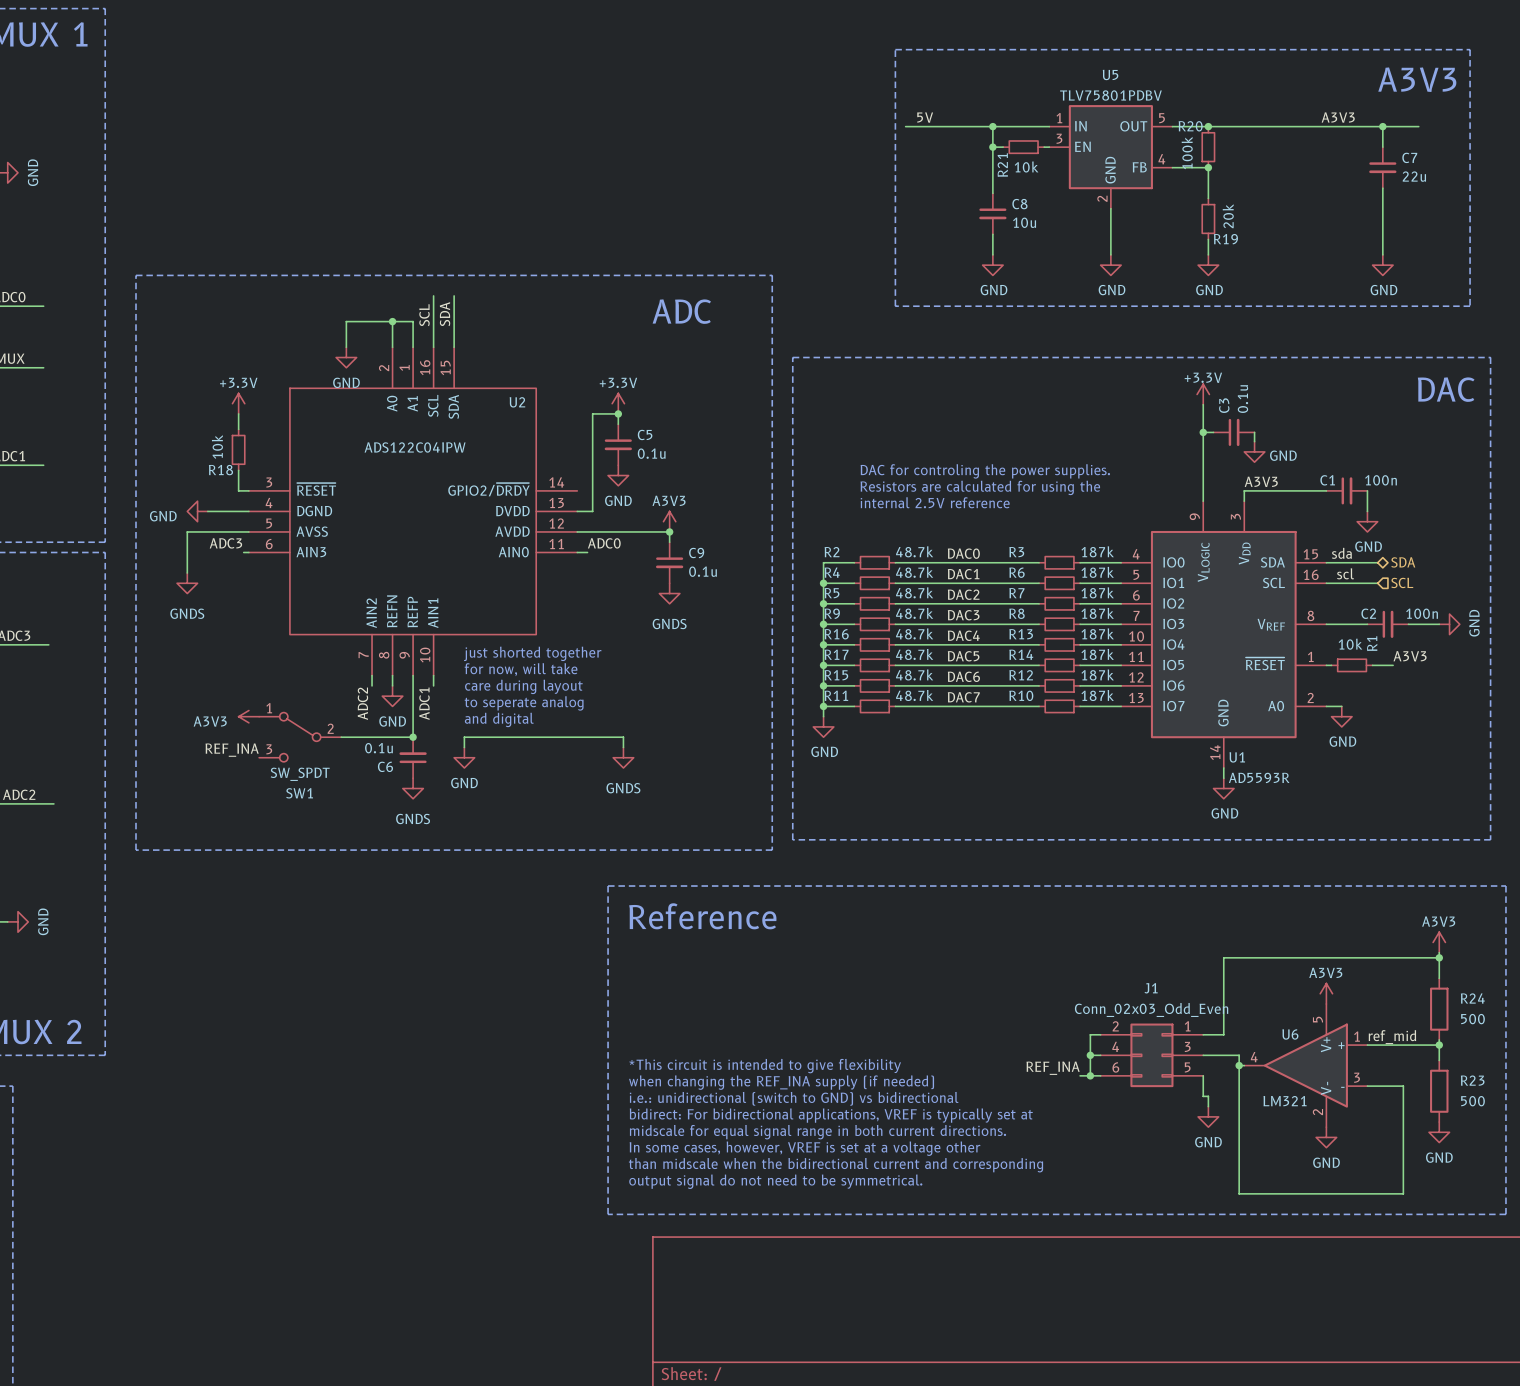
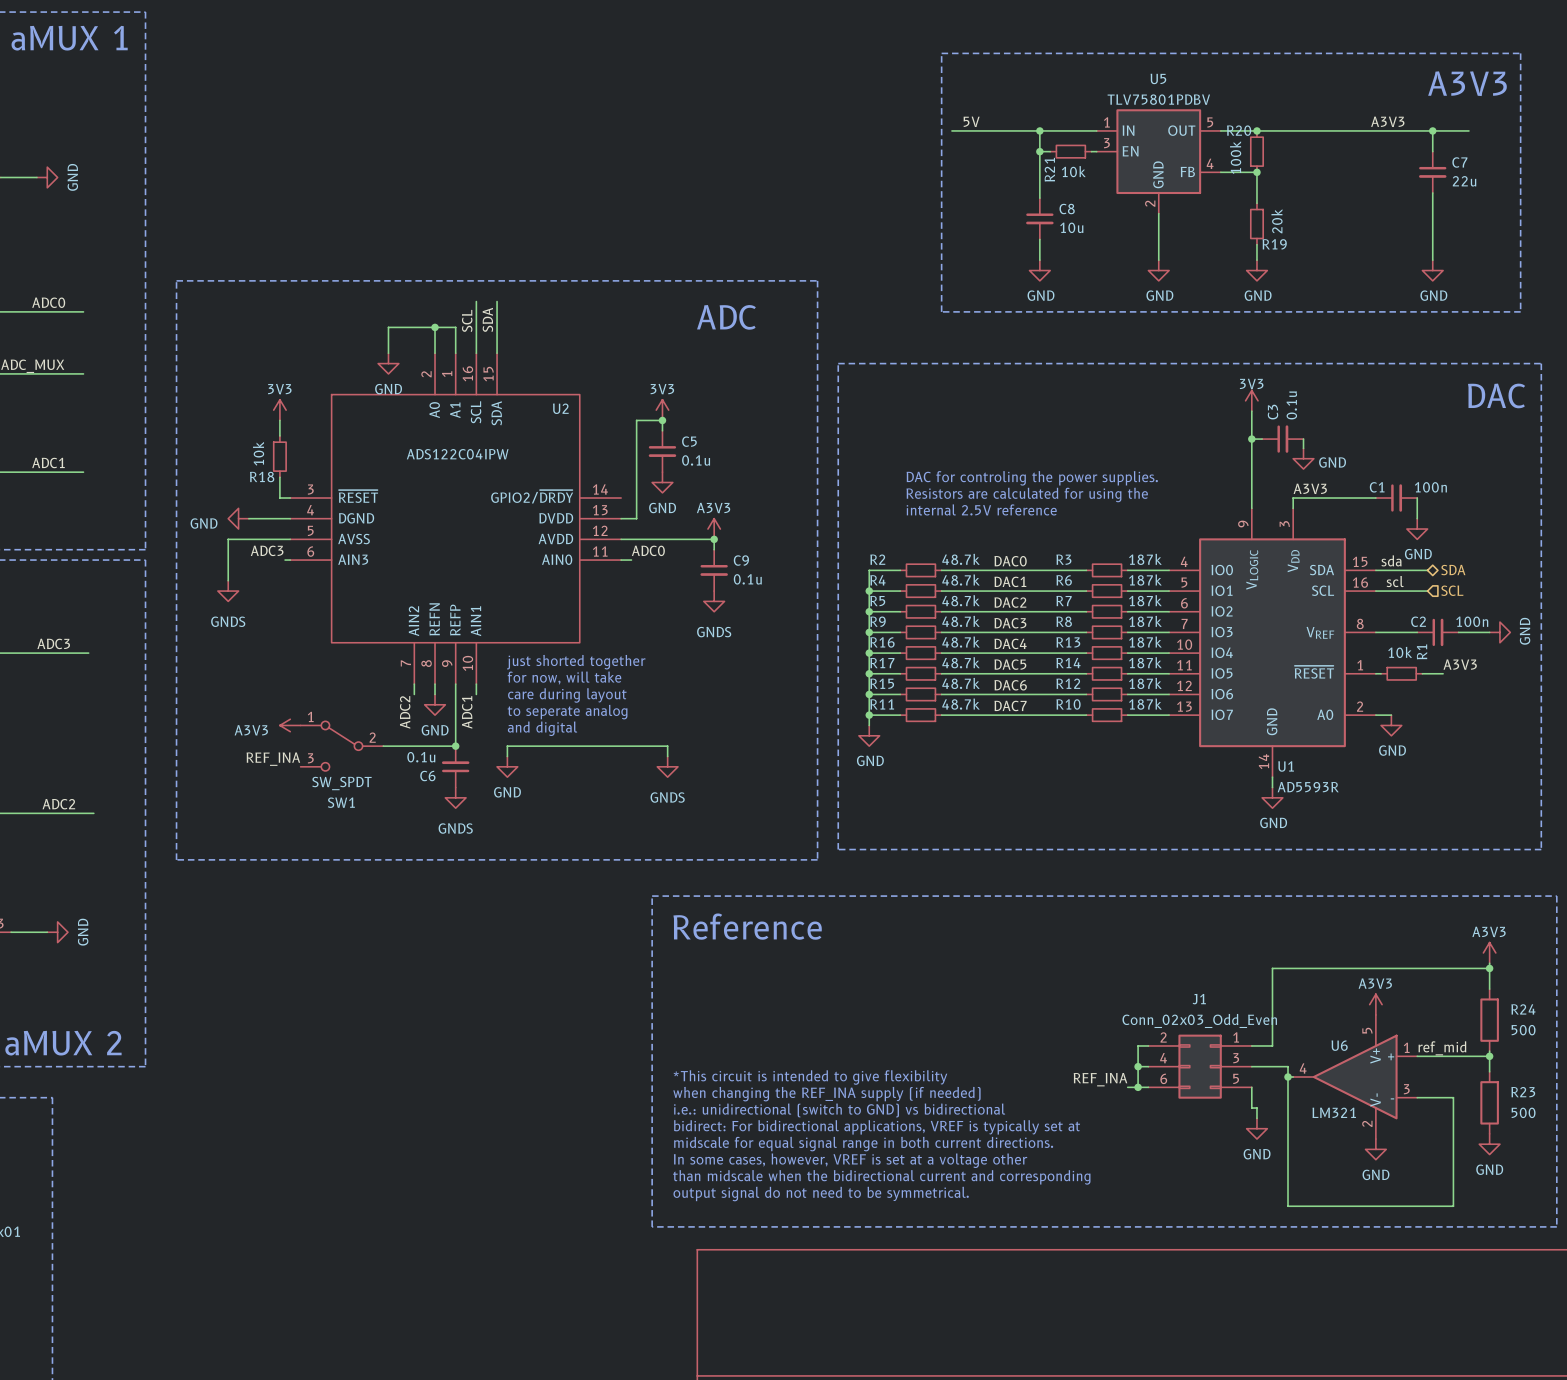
power symbol: +3.3V (1203, 394) -> 3V3 (1251, 400)
power symbol: +3.3V (238, 403) -> 3V3 (279, 410)
power symbol: +3.3V (618, 403) -> 3V3 (662, 410)

